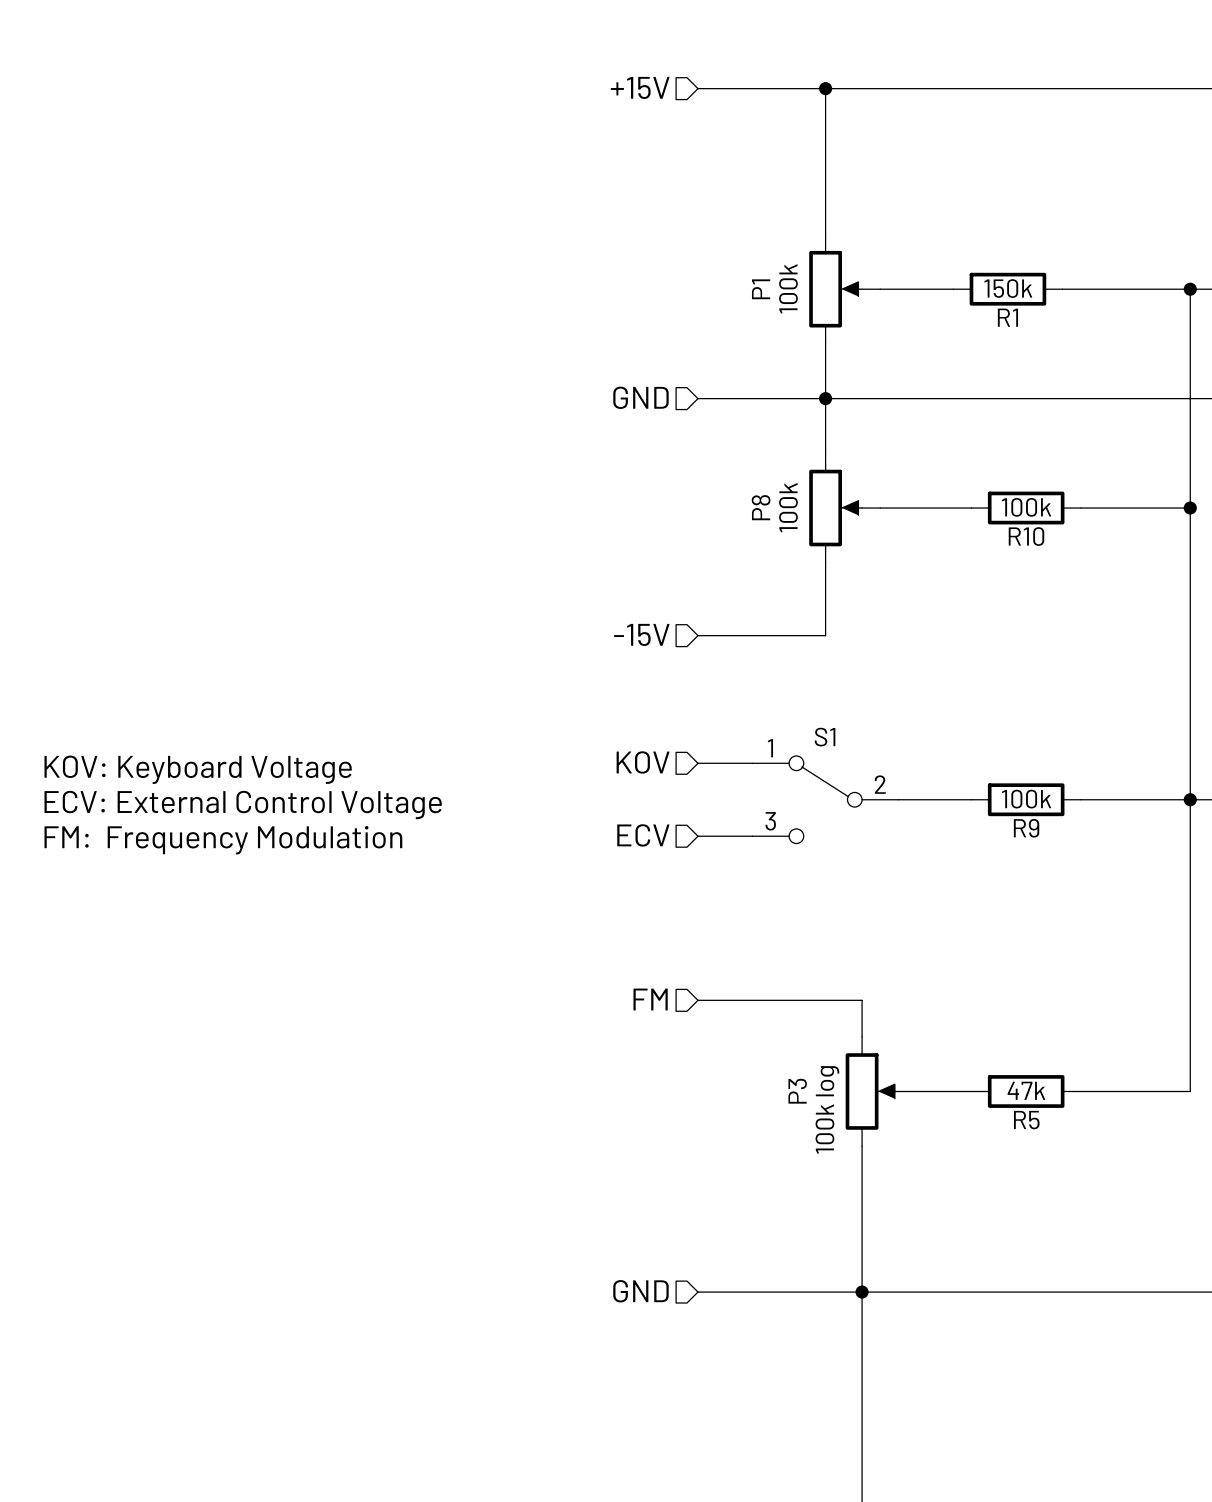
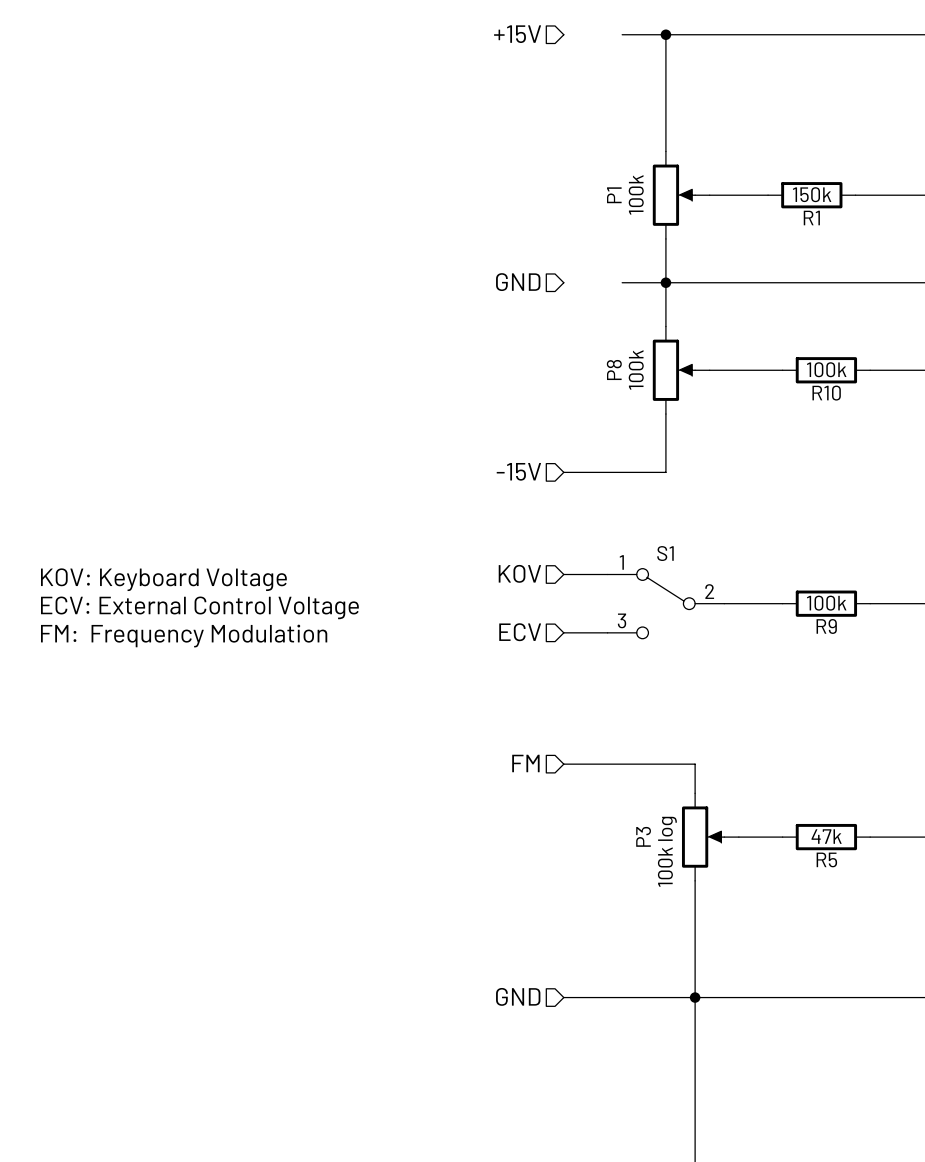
wire: (697, 88) (770, 88) -> none
wire: (697, 398) (770, 398) -> none

